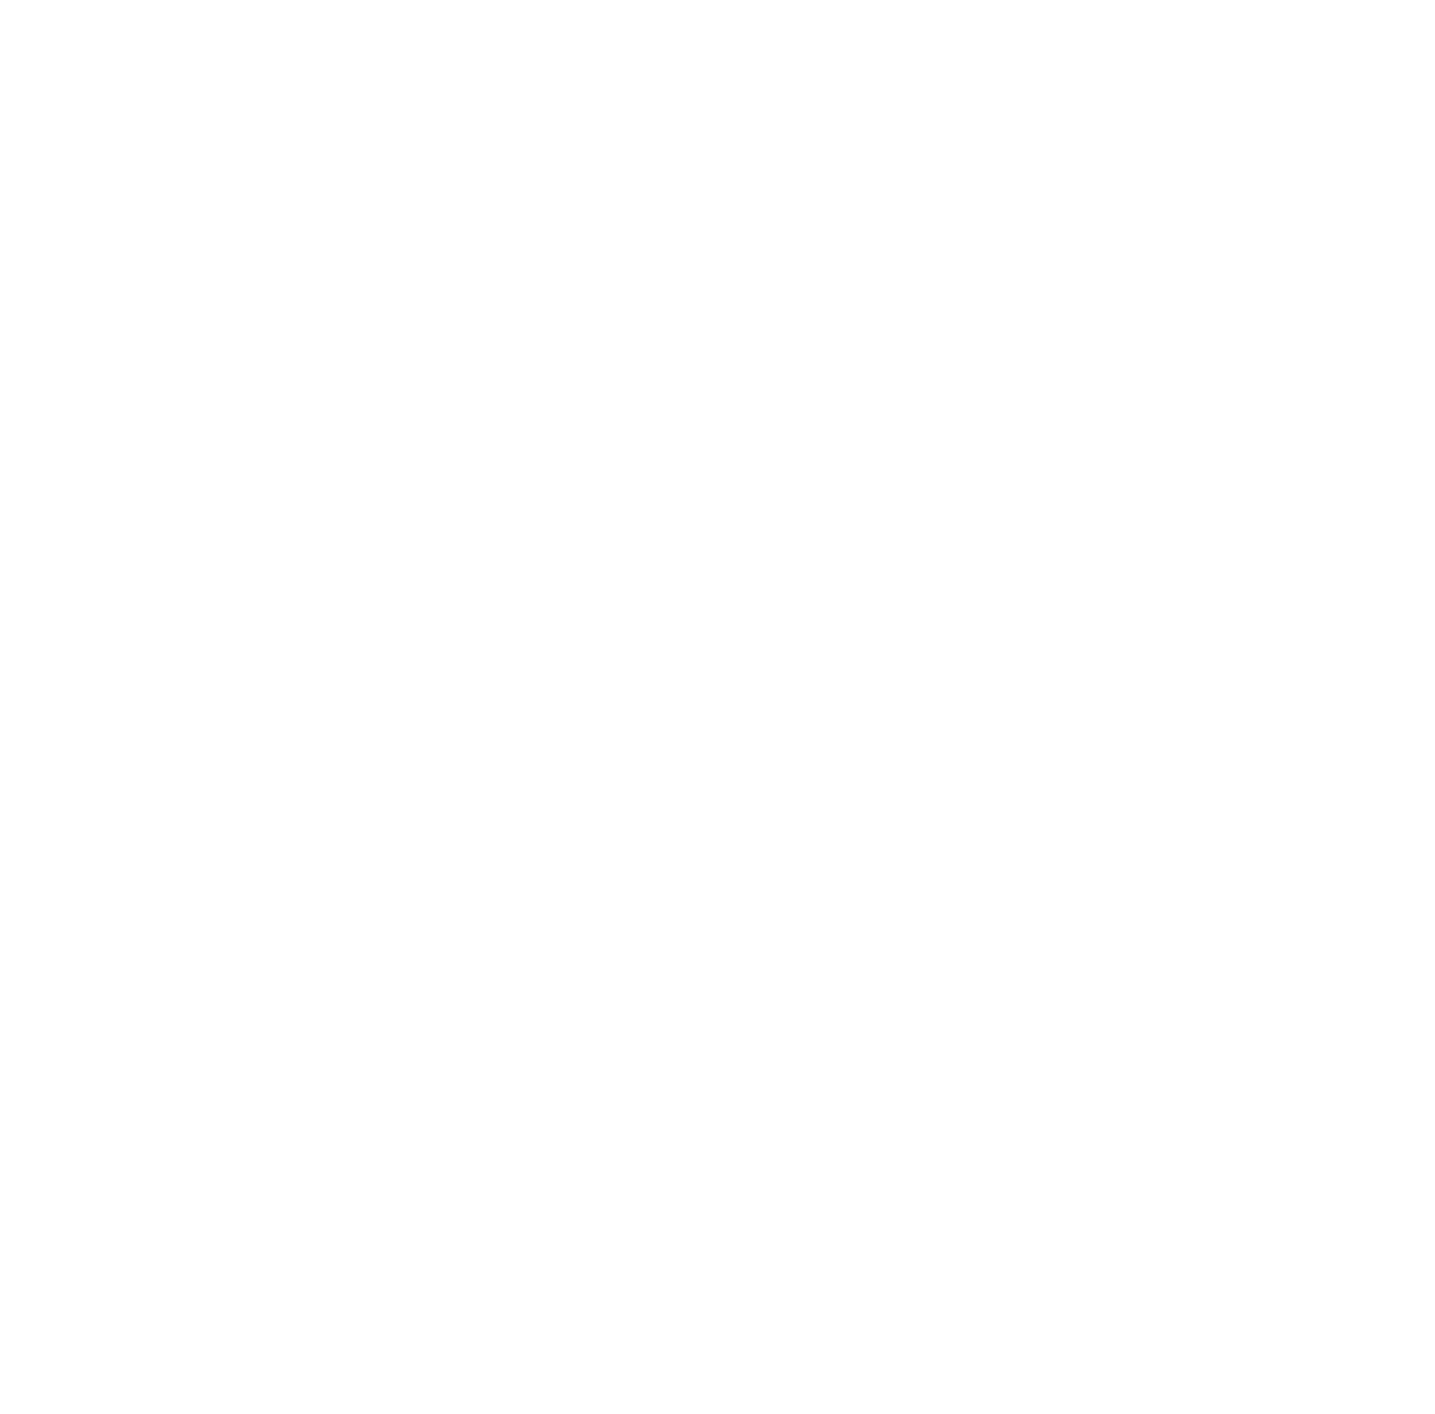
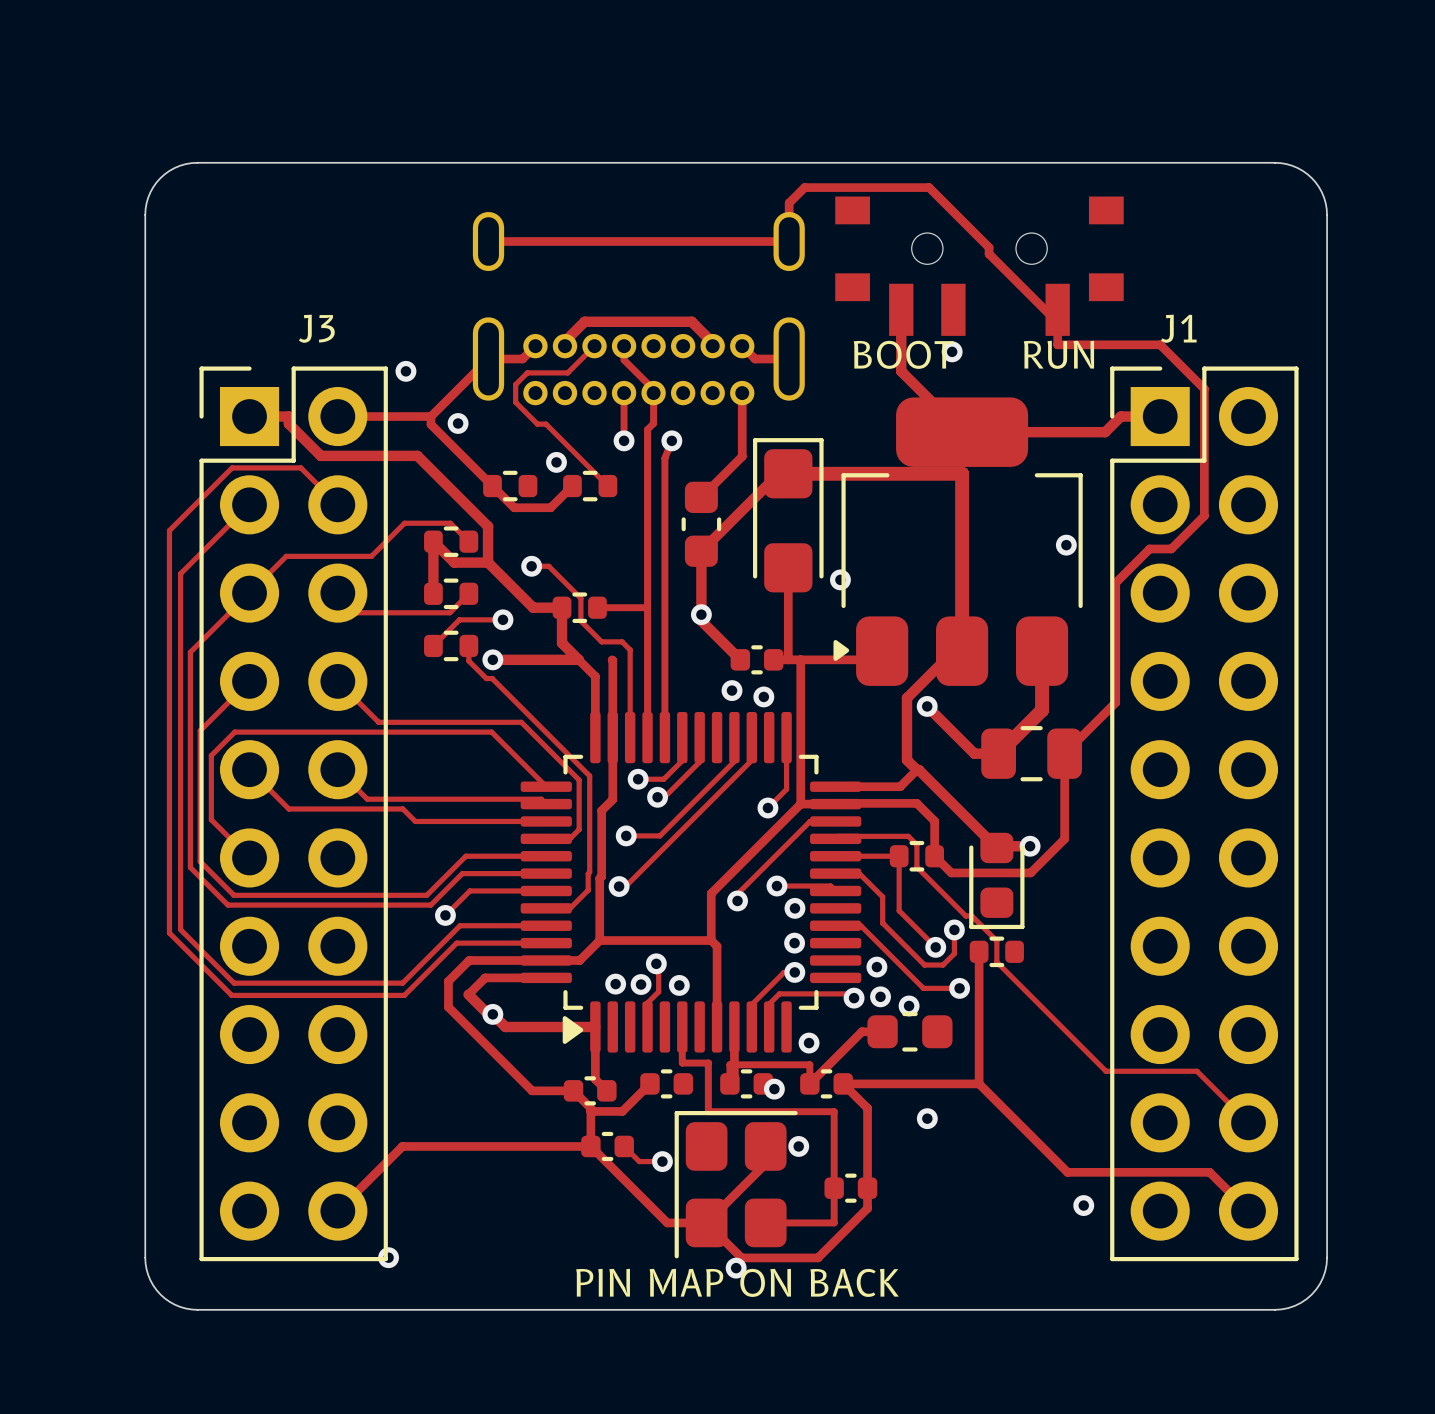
board edge: none -> (197, 162) (1274, 162) (1292, 165) (1311, 178) (1321, 192) (1327, 214) (1327, 1257) (1323, 1277) (1311, 1294) (1294, 1305) (1274, 1309) (197, 1309) (180, 1306) (160, 1294) (148, 1274) (145, 1257) (145, 214) (148, 197) (160, 178) (174, 167) (197, 162)
track: none -> (488, 241) (789, 241) (789, 203) (804, 187) (929, 187) (989, 247) (989, 253) (1054, 319) (1057, 319)
part: none -> (979, 266)
part: none -> (638, 308)
track: none -> (901, 309) (901, 371) (962, 432) (1105, 432) (1120, 416) (1160, 416)
track: none -> (1057, 309) (1057, 344) (1160, 344) (1204, 388) (1204, 515) (1171, 548) (1149, 548) (1115, 582) (1115, 702) (1064, 753) (1064, 839) (1030, 872) (951, 872) (934, 856) (934, 821) (916, 803) (800, 804)
text: none -> J3 (316, 328)
text: none -> J1 (1178, 328)
track: none -> (535, 346) (522, 359) (488, 359) (430, 416)
track: none -> (564, 346) (564, 341) (584, 321) (691, 321) (712, 342) (712, 346)
track: none -> (594, 346) (567, 372) (527, 372) (515, 384) (515, 402) (537, 424) (545, 424) (607, 486)
track: none -> (624, 346) (624, 360) (653, 389) (653, 423) (647, 429) (647, 737)
track: none -> (742, 346) (755, 359) (789, 359)
via: none -> (952, 351)
text: none -> BOOT (903, 354)
text: none -> RUN (1058, 354)
via: none -> (405, 371)
track: none -> (624, 393) (624, 440)
track: none -> (742, 393) (742, 456) (701, 497)
track: none -> (249, 416) (288, 416) (288, 423) (320, 455) (417, 455) (488, 526) (488, 562)
track: none -> (337, 416) (430, 416)
track: none -> (430, 416) (430, 424) (514, 507) (550, 507) (572, 486)
via: none -> (458, 423)
via: none -> (624, 440)
track: none -> (671, 440) (664, 458) (664, 737)
via: none -> (671, 440)
via: none -> (556, 462)
part: none -> (510, 486)
part: none -> (590, 486)
track: none -> (249, 504) (180, 573) (180, 929) (234, 983) (402, 983) (460, 925) (546, 925)
track: none -> (337, 504) (300, 467) (232, 467) (169, 530) (169, 933) (231, 995) (404, 995) (456, 943) (546, 943)
part: none -> (788, 515)
part: none -> (701, 524)
part: none -> (451, 541)
track: none -> (468, 541) (450, 523) (404, 523) (371, 556) (286, 556) (190, 652) (190, 867) (227, 905) (430, 905) (462, 873) (546, 873)
part: none -> (958, 541)
via: none -> (1066, 545)
track: none -> (488, 562) (533, 607) (562, 607) (562, 643) (578, 659)
track: none -> (488, 562) (454, 562) (433, 541) (433, 593)
track: none -> (531, 566) (548, 566) (580, 598) (580, 621) (601, 641) (622, 641) (630, 649) (630, 737)
via: none -> (531, 566)
track: none -> (788, 567) (788, 659)
via: none -> (840, 579)
track: none -> (337, 593) (357, 612) (449, 612) (468, 593)
part: none -> (451, 593)
part: none -> (579, 607)
track: none -> (597, 607) (647, 607)
via: none -> (701, 614)
track: none -> (502, 619) (459, 619) (433, 645)
via: none -> (502, 619)
part: none -> (451, 645)
track: none -> (468, 645) (468, 661) (486, 678) (492, 678) (589, 776) (588, 890) (570, 908) (546, 908)
track: none -> (882, 651) (873, 659) (773, 659)
track: none -> (1042, 651) (1042, 710) (998, 753) (974, 753) (927, 706)
track: none -> (492, 659) (578, 659)
via: none -> (492, 659)
track: none -> (578, 659) (595, 676) (595, 737)
track: none -> (612, 659) (612, 799) (601, 810) (599, 940)
track: none -> (740, 659) (701, 620) (701, 551) (778, 473) (962, 473) (962, 651) (953, 651) (906, 698) (906, 760) (916, 770)
part: none -> (757, 659)
track: none -> (800, 659) (800, 804)
track: none -> (249, 681) (200, 730) (200, 861) (233, 895) (426, 895) (465, 856) (546, 856)
track: none -> (337, 681) (378, 722) (521, 722) (579, 780) (579, 829) (569, 838) (546, 838)
via: none -> (732, 690)
via: none -> (763, 696)
via: none -> (927, 706)
track: none -> (682, 737) (682, 760) (663, 779) (638, 779)
track: none -> (699, 737) (699, 762) (664, 797) (657, 797)
track: none -> (734, 737) (734, 761) (659, 835) (626, 835)
track: none -> (751, 737) (751, 760) (625, 886) (619, 886)
track: none -> (786, 737) (786, 789) (767, 808)
part: none -> (1031, 753)
track: none -> (249, 769) (288, 809) (402, 809) (415, 821) (546, 821)
track: none -> (337, 769) (367, 799) (541, 799) (546, 804)
track: none -> (916, 770) (900, 786) (835, 786)
track: none -> (916, 770) (996, 847) (998, 846) (1030, 846)
via: none -> (638, 779)
track: none -> (546, 786) (491, 732) (234, 732) (211, 755) (211, 819) (249, 857)
via: none -> (657, 797)
track: none -> (800, 804) (711, 893) (711, 940)
via: none -> (767, 808)
part: none -> (293, 813)
part: none -> (1204, 813)
track: none -> (835, 821) (810, 821) (737, 894) (737, 900)
via: none -> (626, 835)
track: none -> (835, 838) (838, 836) (908, 836) (916, 844) (916, 867) (965, 916) (971, 916) (996, 940) (996, 962) (1106, 1071) (1196, 1071) (1248, 1122)
via: none -> (1030, 846)
track: none -> (835, 856) (899, 856) (899, 910) (935, 947)
part: none -> (916, 856)
track: none -> (835, 873) (859, 873) (882, 896) (882, 923) (924, 965) (943, 965) (954, 953) (954, 929)
part: none -> (996, 880)
part: none -> (690, 882)
via: none -> (619, 886)
track: none -> (776, 886) (830, 886) (835, 890)
via: none -> (776, 886)
track: none -> (546, 890) (469, 890) (445, 915)
via: none -> (737, 900)
via: none -> (794, 908)
via: none -> (445, 915)
track: none -> (835, 925) (860, 925) (923, 988) (959, 988)
via: none -> (954, 929)
track: none -> (599, 940) (711, 940)
track: none -> (599, 940) (579, 960) (469, 960) (448, 981) (448, 1007) (532, 1090) (573, 1090) (590, 1108) (590, 1146)
track: none -> (711, 940) (717, 946) (717, 1026)
via: none -> (794, 943)
via: none -> (935, 947)
track: none -> (979, 951) (979, 1083)
part: none -> (996, 951)
track: none -> (656, 963) (658, 966) (658, 991) (647, 1002) (647, 1026)
via: none -> (656, 963)
via: none -> (876, 967)
track: none -> (794, 972) (784, 972) (751, 1004) (751, 1026)
via: none -> (794, 972)
track: none -> (546, 977) (485, 977) (468, 994) (488, 1014) (492, 1014) (505, 1026) (595, 1026) (595, 1079) (606, 1090)
via: none -> (615, 984)
via: none -> (641, 984)
via: none -> (679, 985)
via: none -> (959, 988)
via: none -> (880, 996)
track: none -> (854, 998) (849, 993) (779, 993) (769, 1004) (769, 1026)
via: none -> (854, 998)
via: none -> (909, 1005)
via: none -> (492, 1014)
track: none -> (682, 1026) (682, 1063) (708, 1063) (708, 1111) (834, 1111) (834, 1222) (765, 1222)
track: none -> (734, 1026) (734, 1079) (729, 1083) (729, 1064) (809, 1064) (809, 1083) (861, 1031) (882, 1031)
part: none -> (909, 1031)
via: none -> (809, 1043)
track: none -> (649, 1083) (622, 1111) (590, 1111)
part: none -> (666, 1083)
part: none -> (746, 1083)
part: none -> (826, 1083)
track: none -> (979, 1083) (1067, 1172) (1209, 1172) (1248, 1211)
track: none -> (979, 1083) (843, 1083) (867, 1108) (867, 1208) (818, 1257) (741, 1257) (706, 1222)
via: none -> (774, 1089)
part: none -> (590, 1090)
via: none -> (927, 1118)
track: none -> (590, 1146) (402, 1146) (337, 1211)
track: none -> (590, 1146) (667, 1222) (706, 1222)
part: none -> (607, 1146)
track: none -> (624, 1146) (639, 1161) (662, 1161)
track: none -> (765, 1146) (765, 1163) (706, 1222)
via: none -> (798, 1146)
via: none -> (662, 1161)
part: none -> (736, 1184)
part: none -> (850, 1188)
via: none -> (1083, 1205)
via: none -> (388, 1257)
via: none -> (736, 1268)
text: none -> PIN MAP ON BACK (737, 1282)

